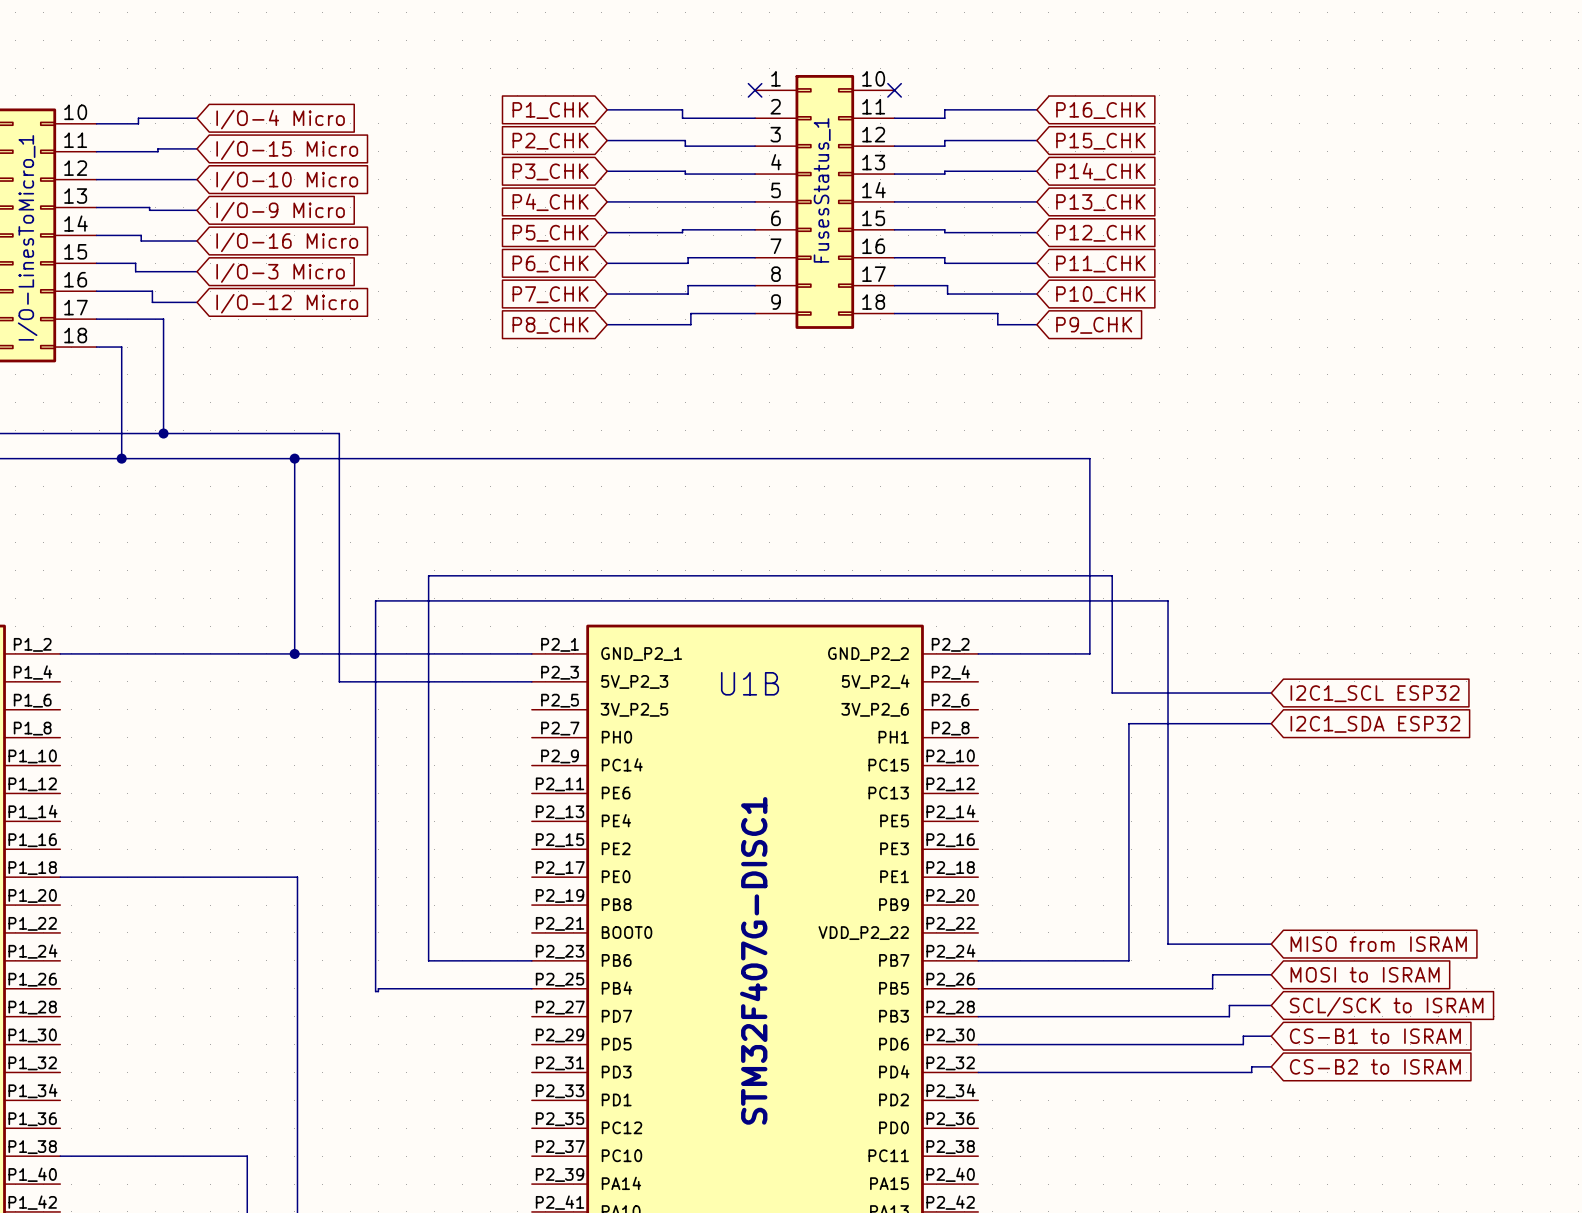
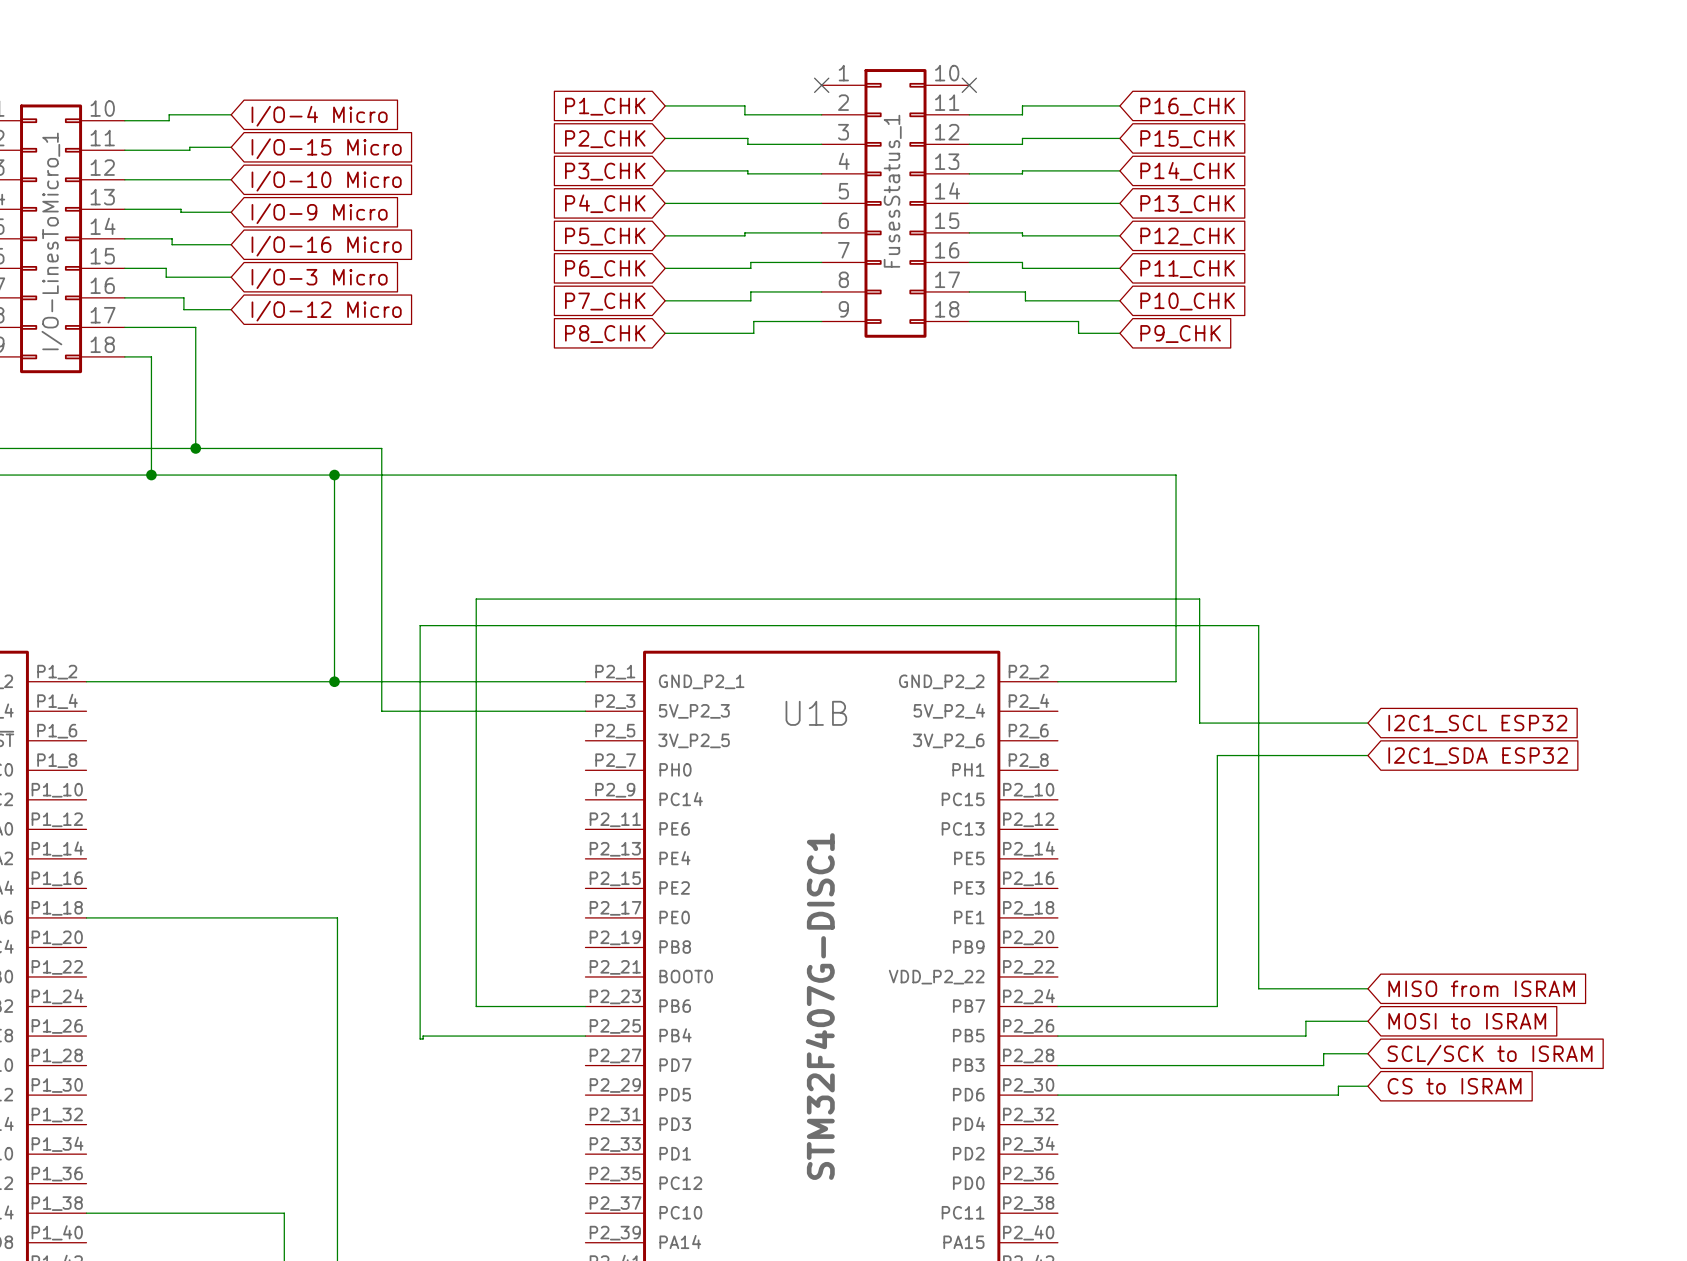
global label: CS-B1 to ISRAM (1375, 1036) -> CS to ISRAM (1454, 1086)
wire: (1271, 1066) (1251, 1066) (1251, 1072) (978, 1072) -> none
global label: CS-B2 to ISRAM (1375, 1066) -> none

